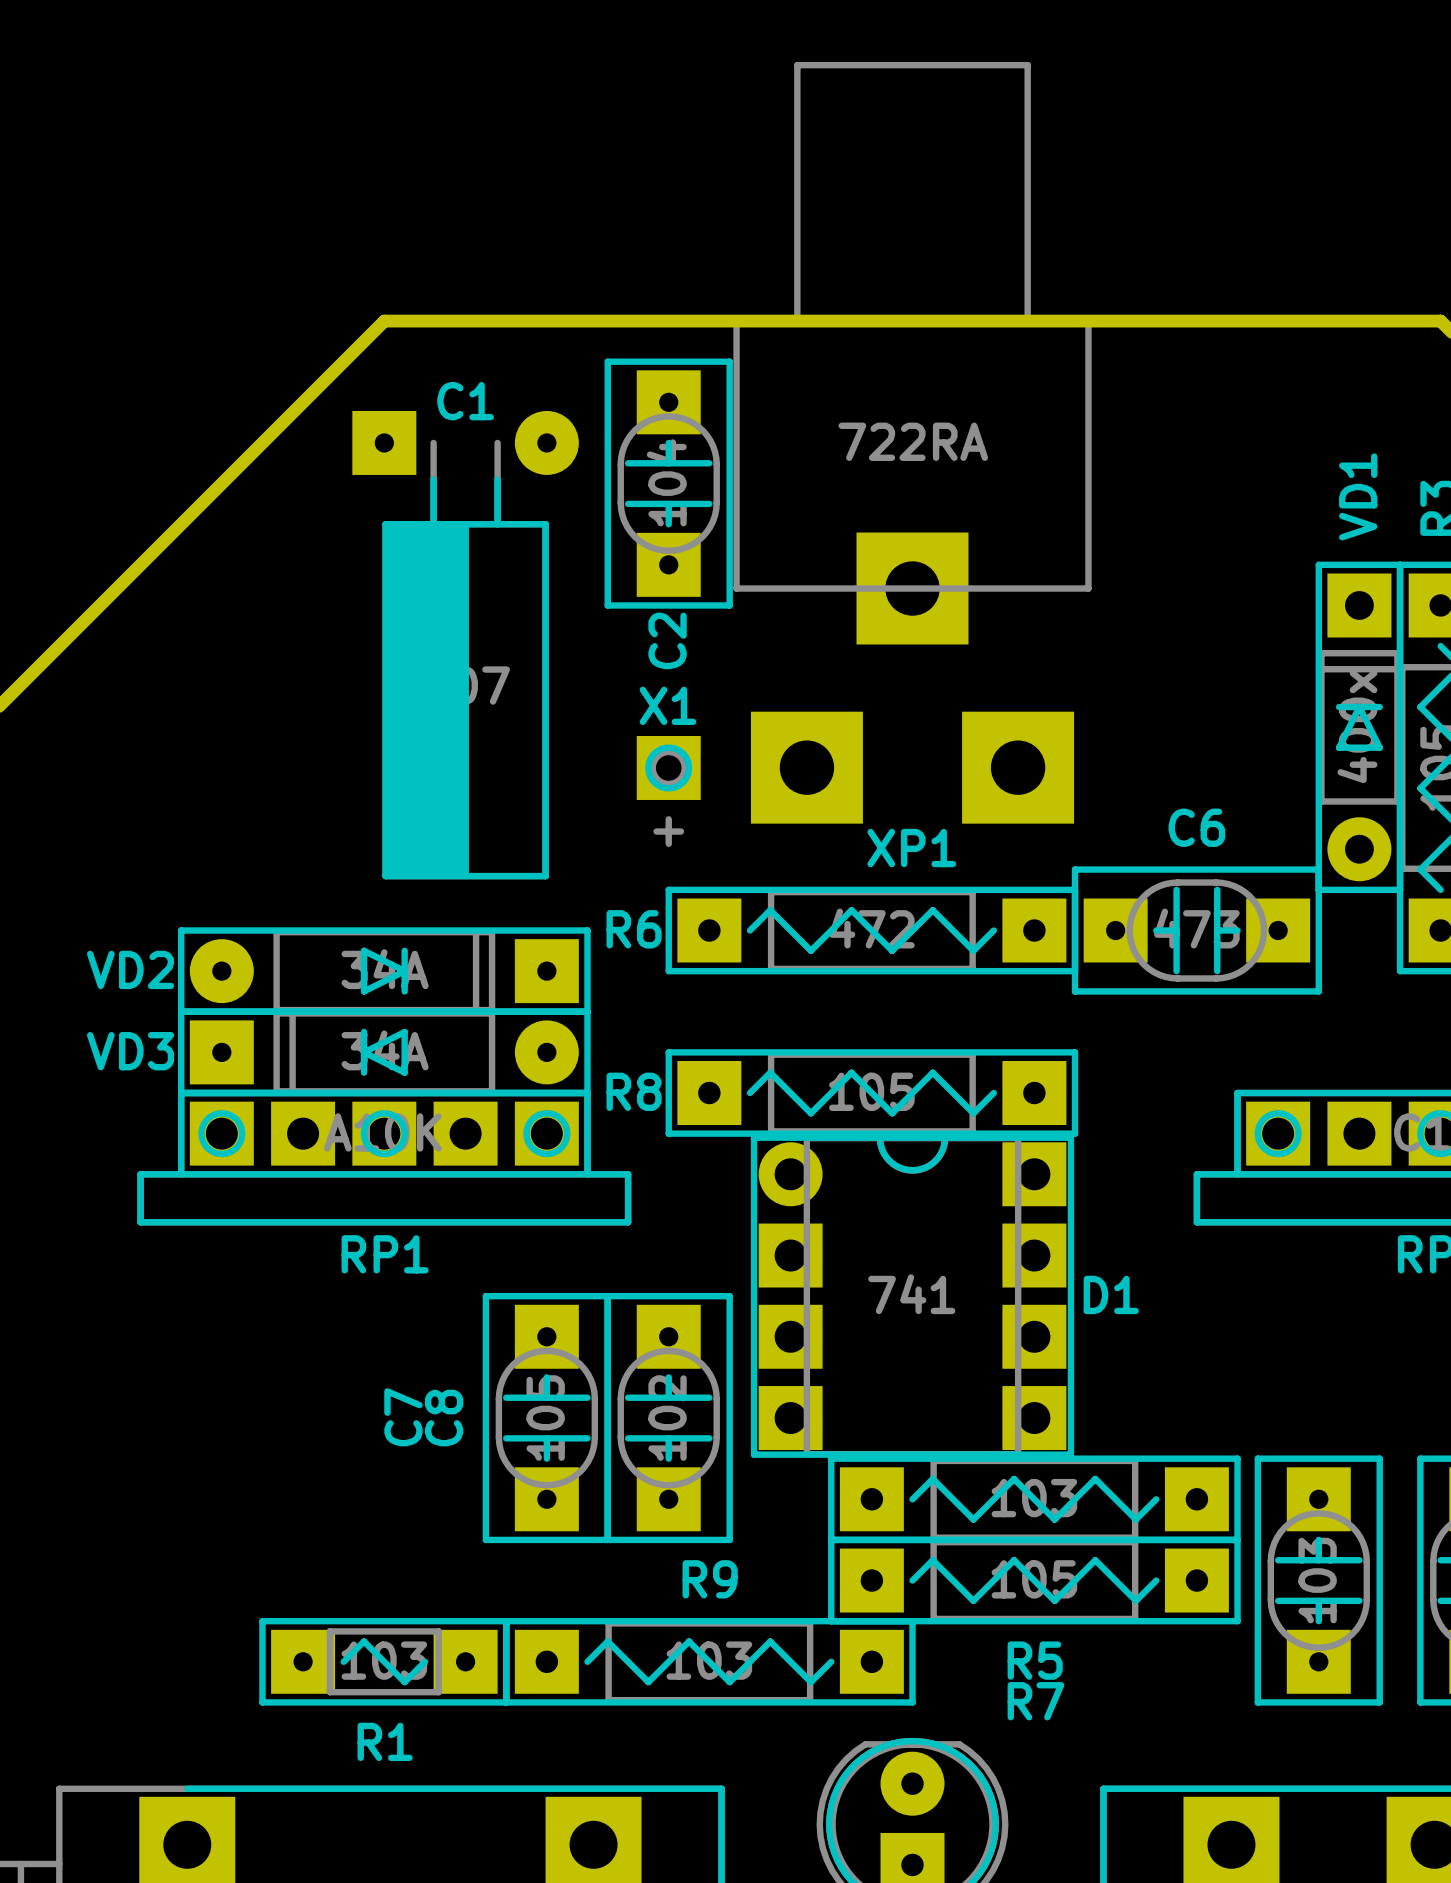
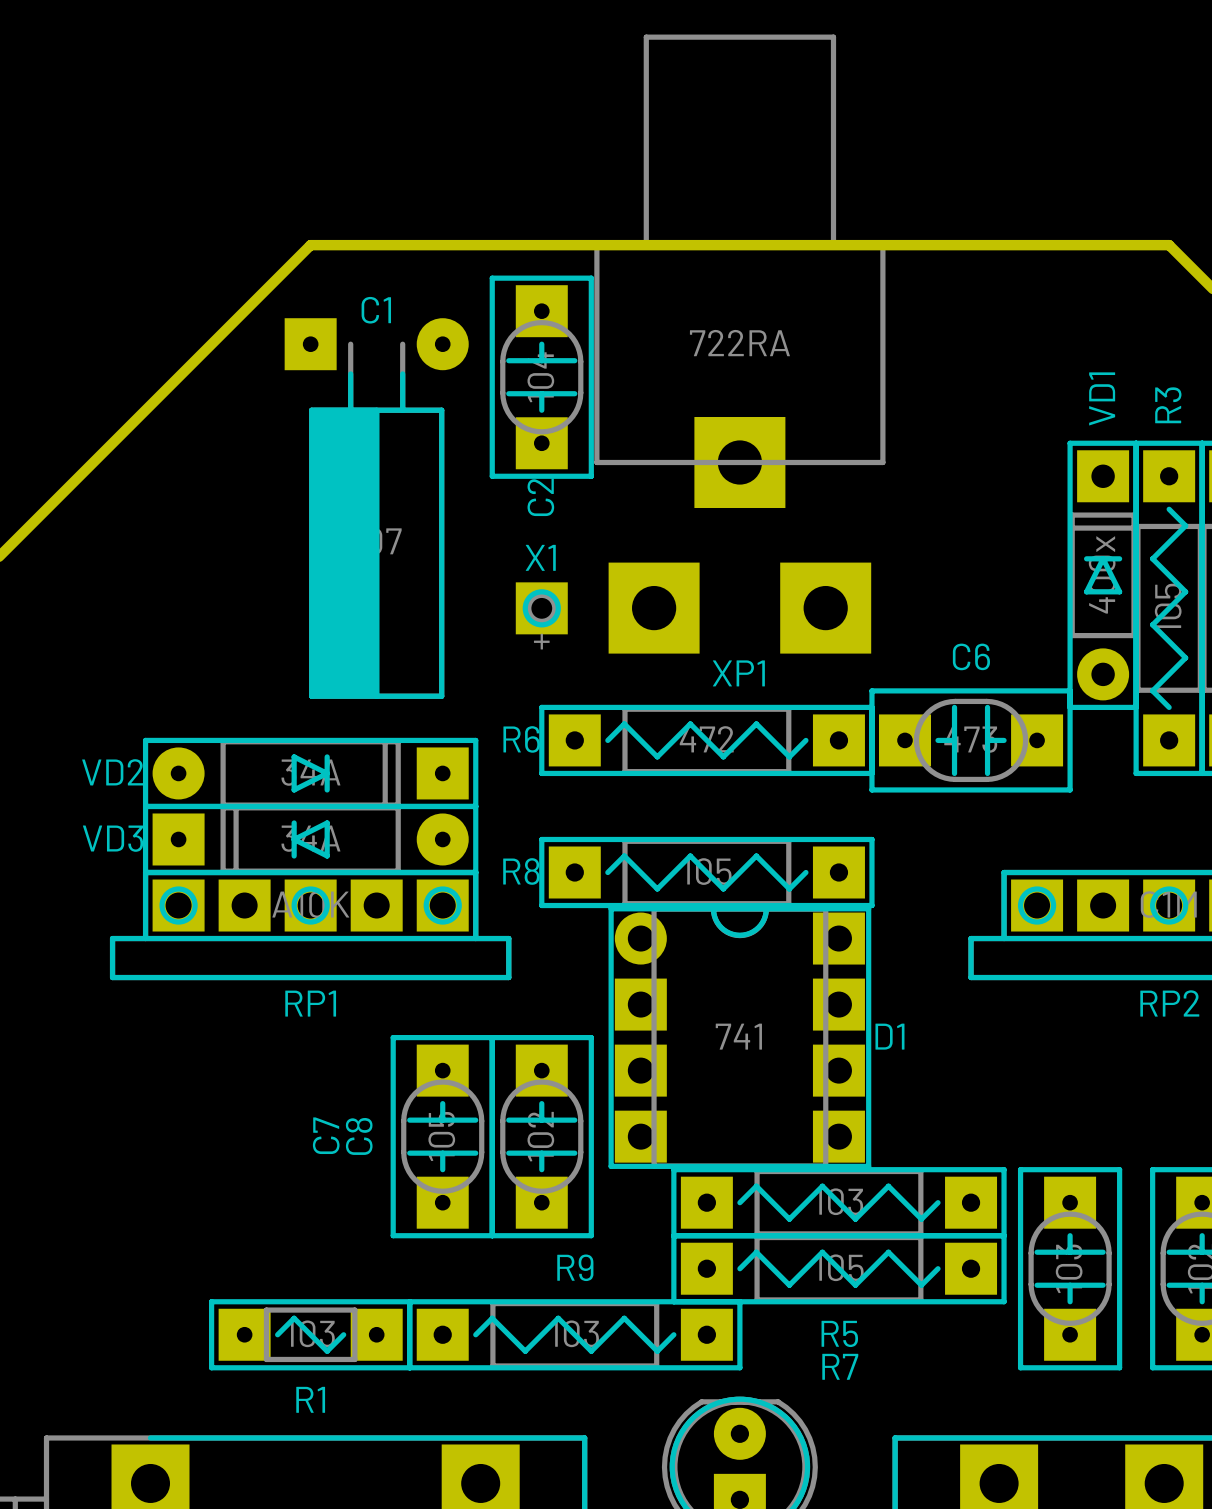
X1 value position: + (668, 831) -> + (541, 641)

